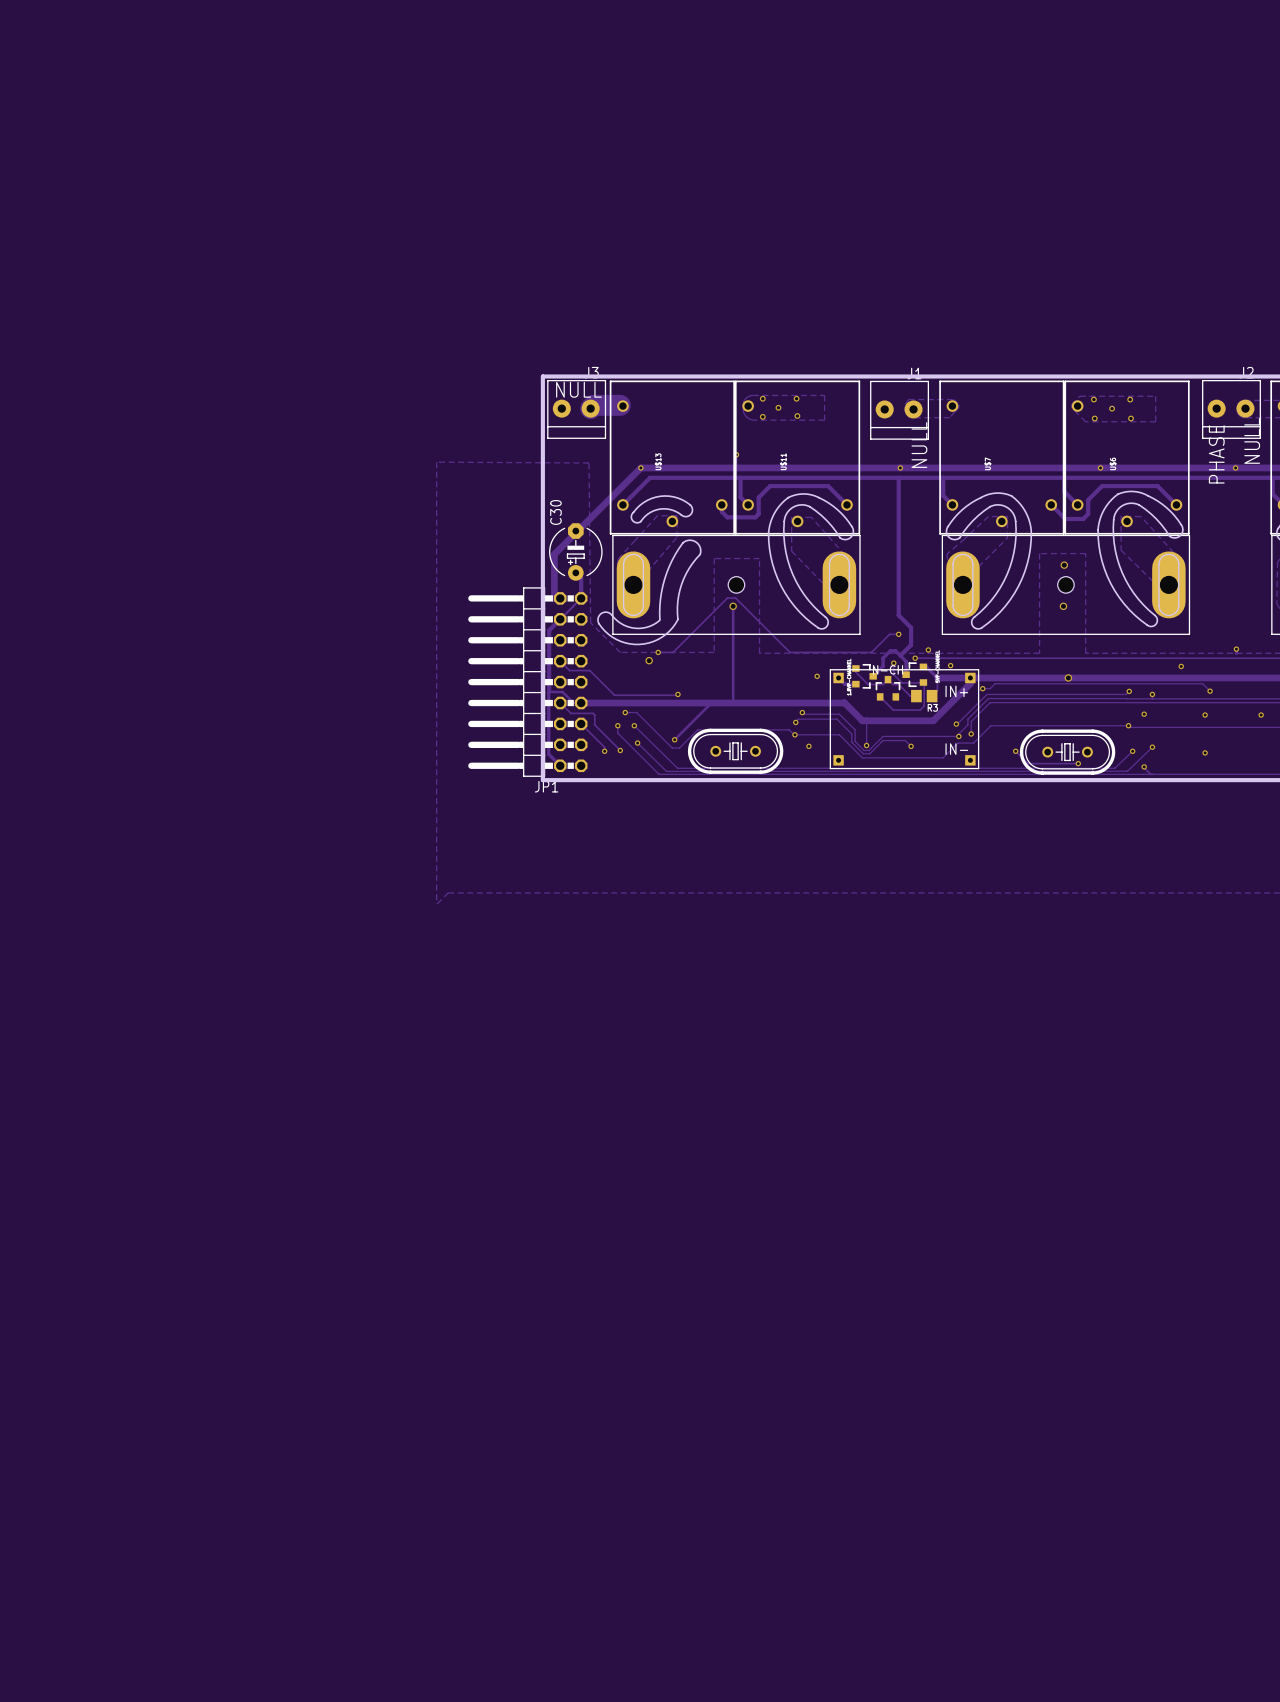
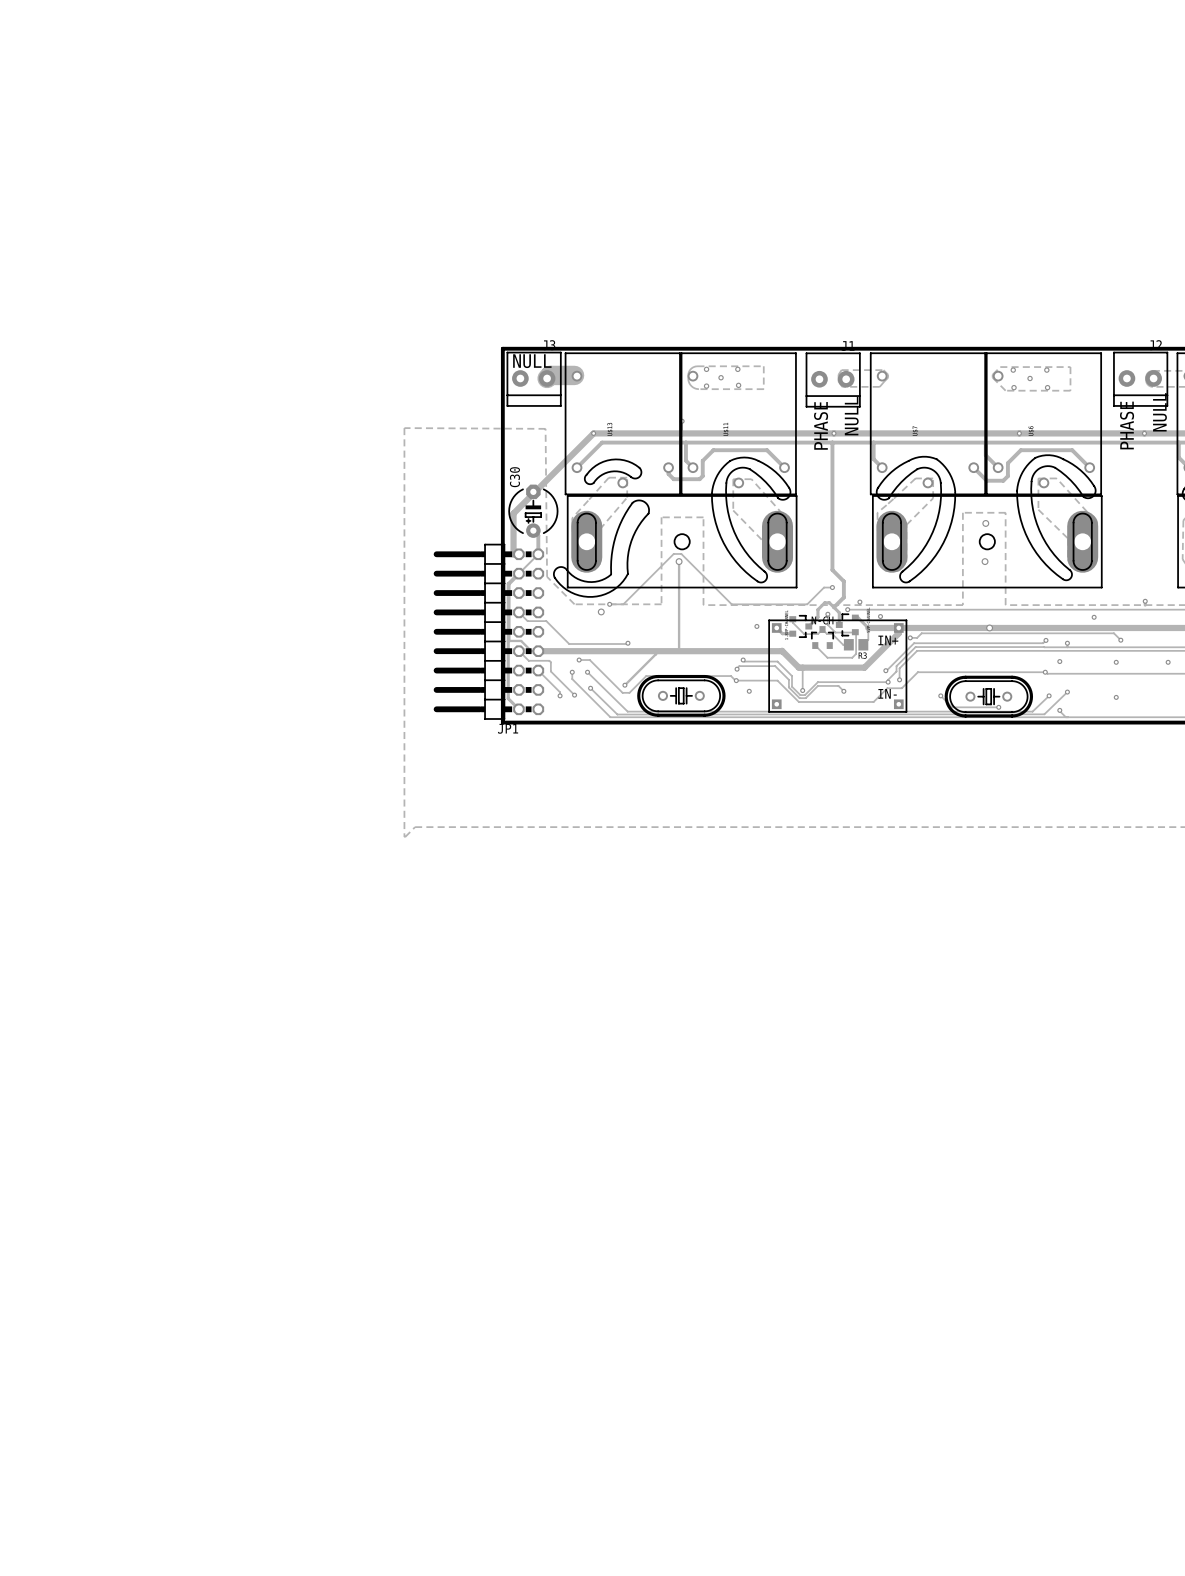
text: none -> PHASE (821, 425)

